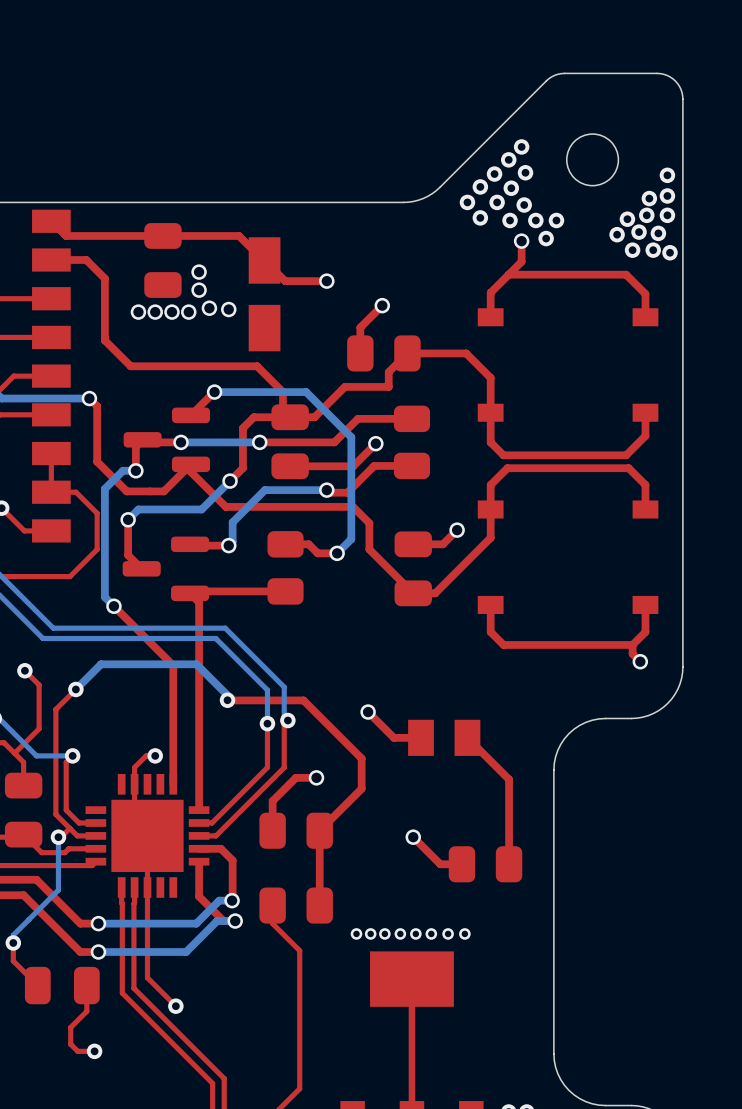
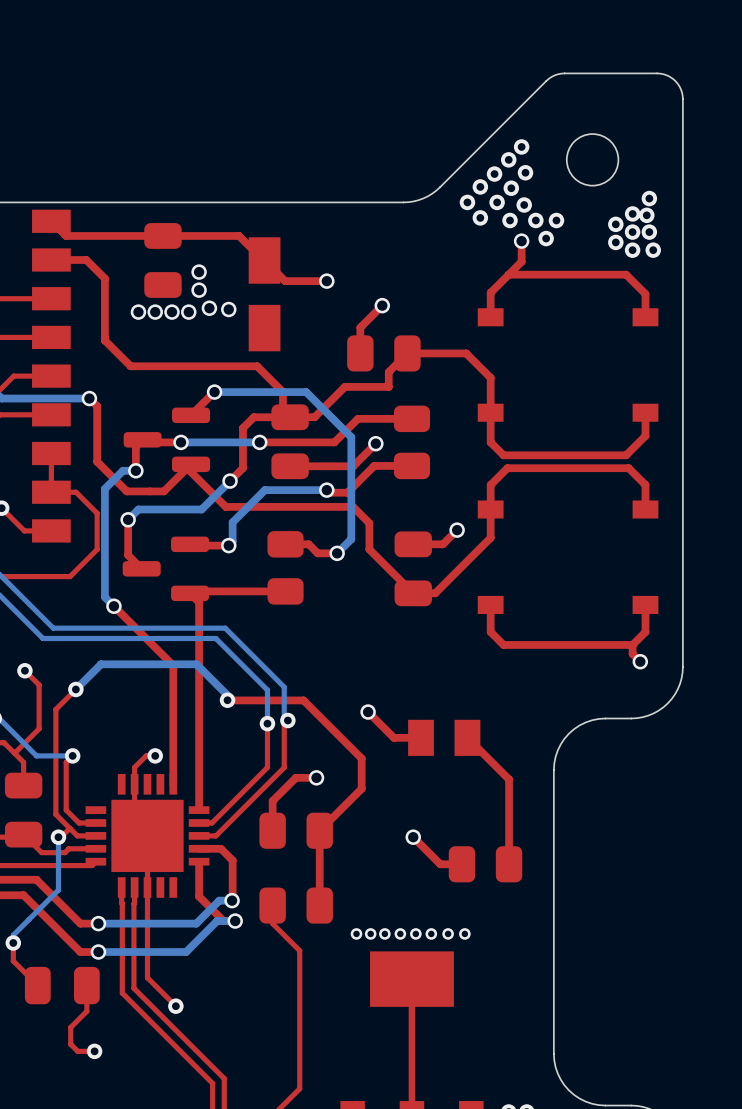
via: (667, 175) -> none
via: (667, 195) -> none
via: none -> (632, 213)
via: (667, 215) -> none
via: (627, 219) -> none
via: none -> (615, 224)
via: none -> (632, 232)
via: (639, 232) -> none
via: none -> (649, 232)
via: (658, 233) -> none
via: (617, 234) -> none
via: none -> (615, 242)
via: (670, 252) -> none

